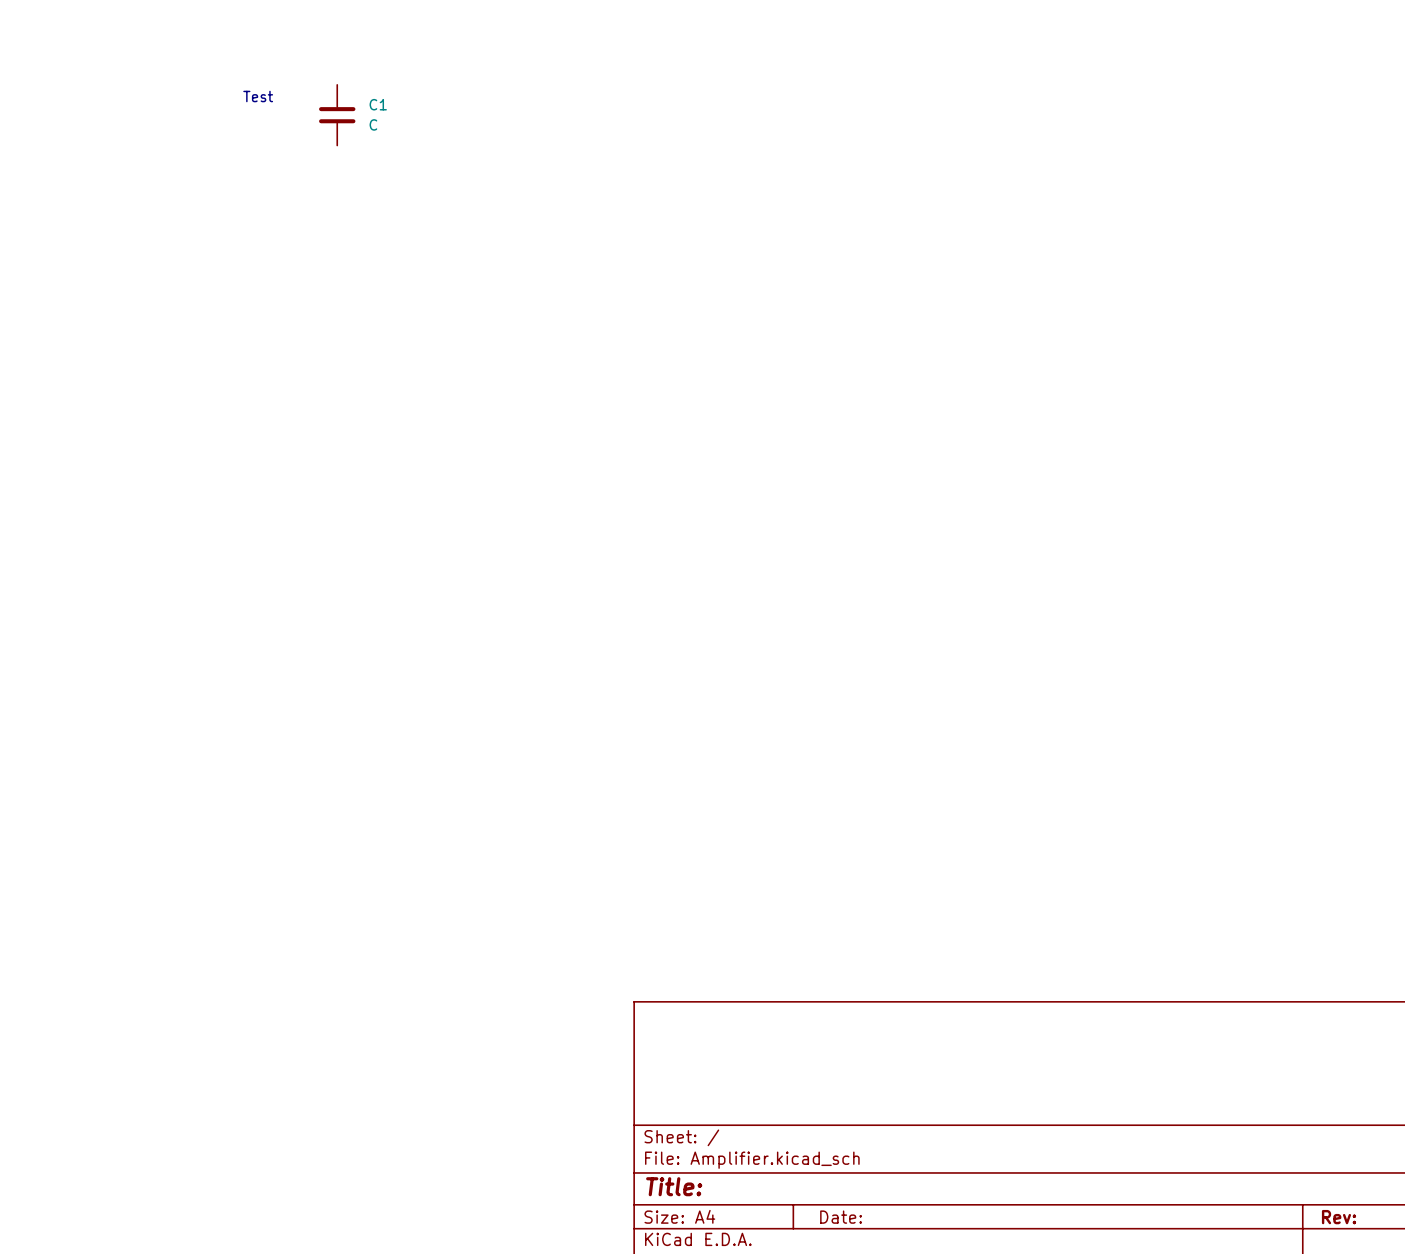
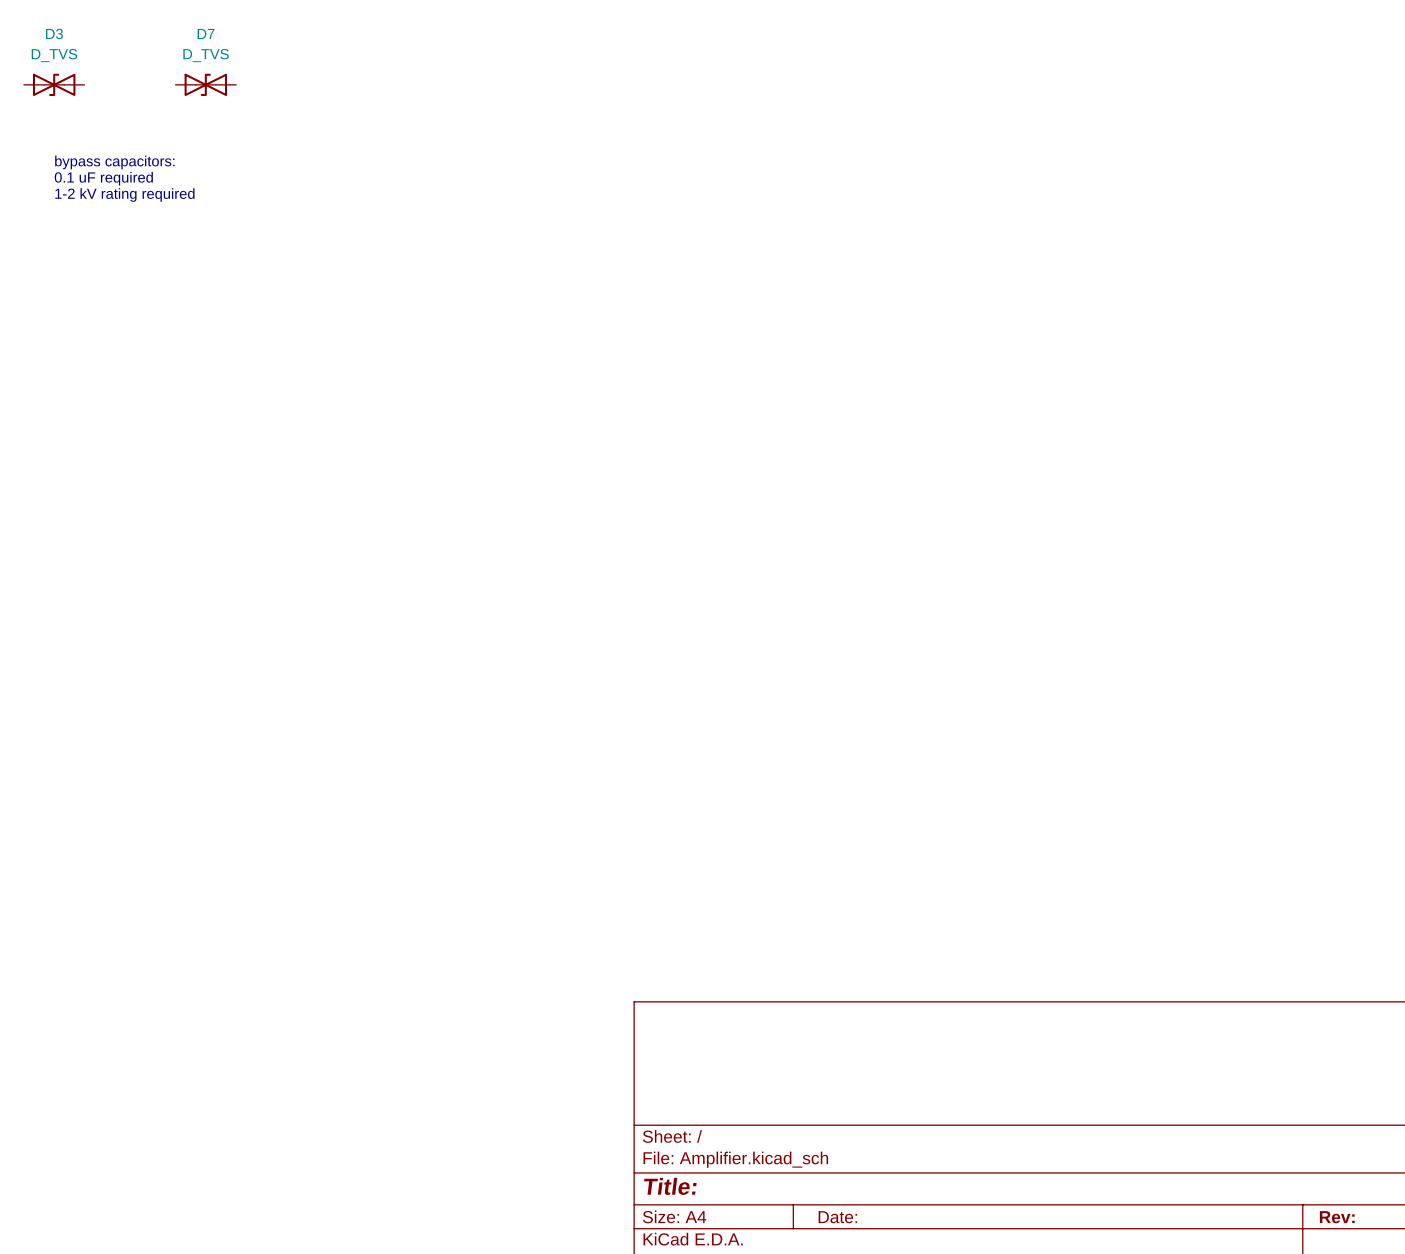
D3: none -> D_TVS (54, 84)
D7: none -> D_TVS (205, 84)
text: Test (258, 96) -> none
C1: C (337, 115) -> none
text: none -> bypass capacitors: (114, 162)
text: none -> 0.1 uF required (103, 178)
text: none -> 1-2 kV rating required (124, 195)

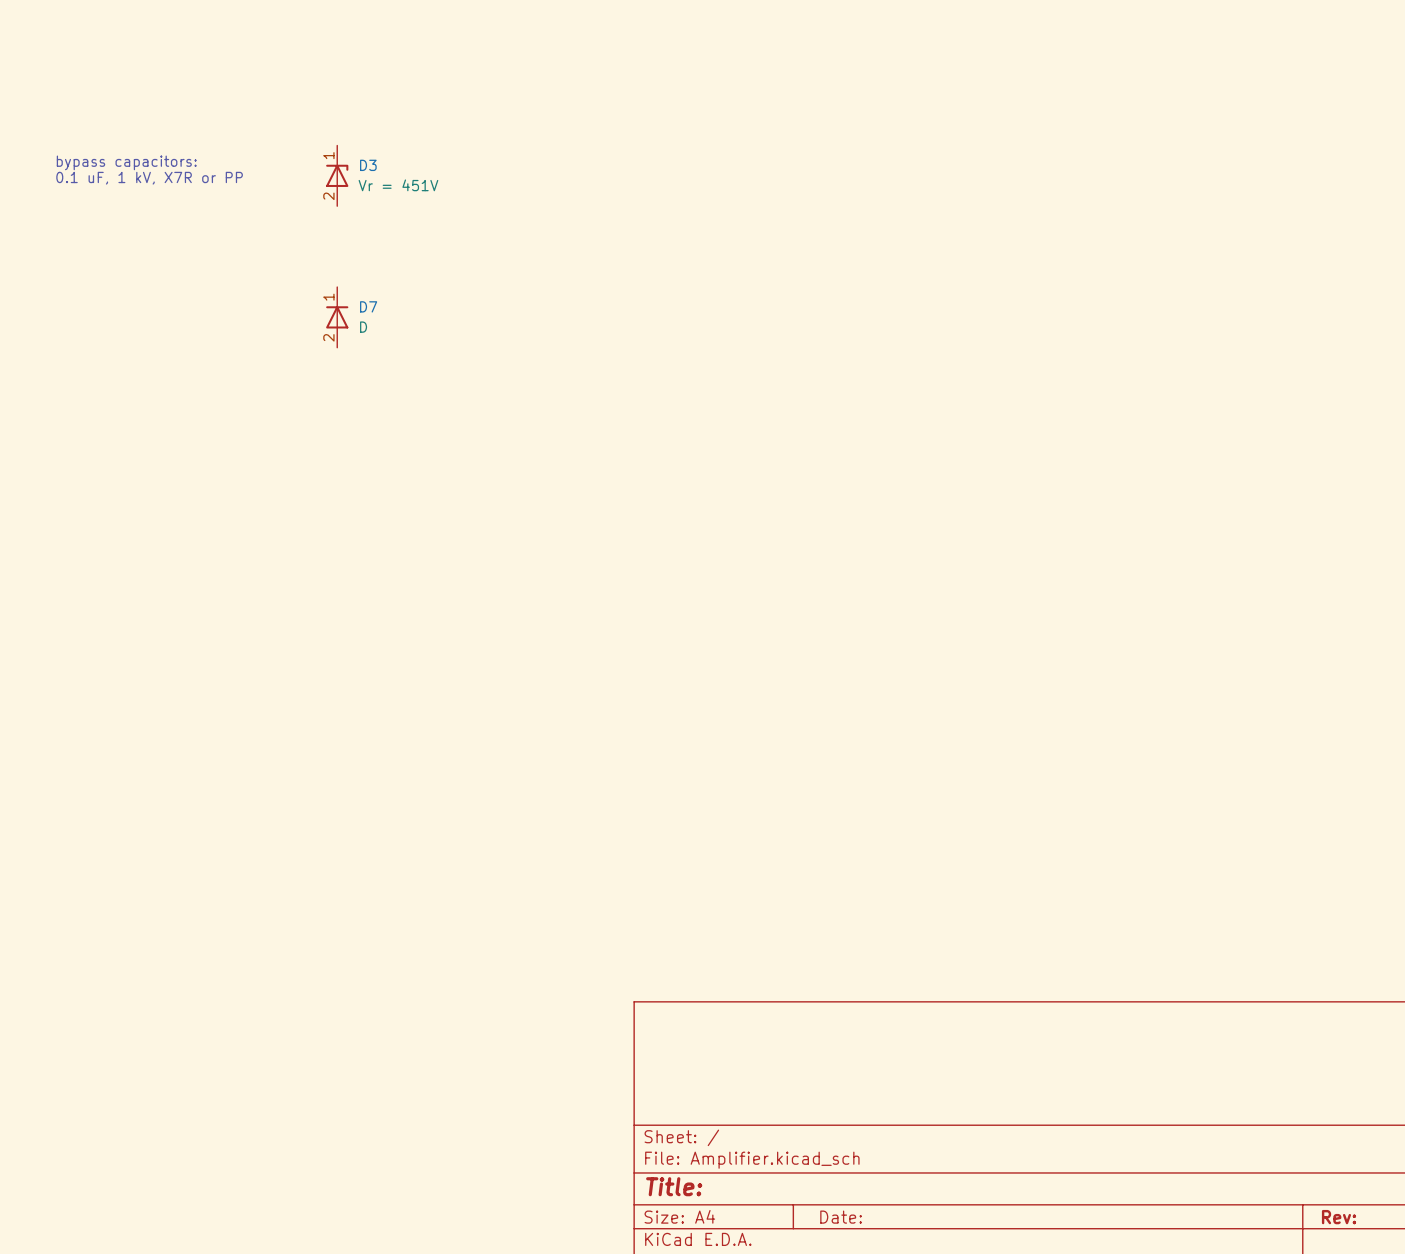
D3 name position: D3 (54, 33) -> D3 (368, 165)
D7 name position: D7 (206, 33) -> D7 (368, 306)
D3 value: D_TVS (54, 55) -> Vr = 451V (398, 185)
D7 value: D_TVS (206, 55) -> D (363, 327)
D3 symbol: [23, 73, 85, 96] -> [326, 145, 349, 207]
D7 symbol: [175, 73, 237, 96] -> [326, 287, 349, 348]
text: 0.1 uF required (103, 178) -> 0.1 uF, 1 kV, X7R or PP (149, 178)
text: 1-2 kV rating required (124, 195) -> none

